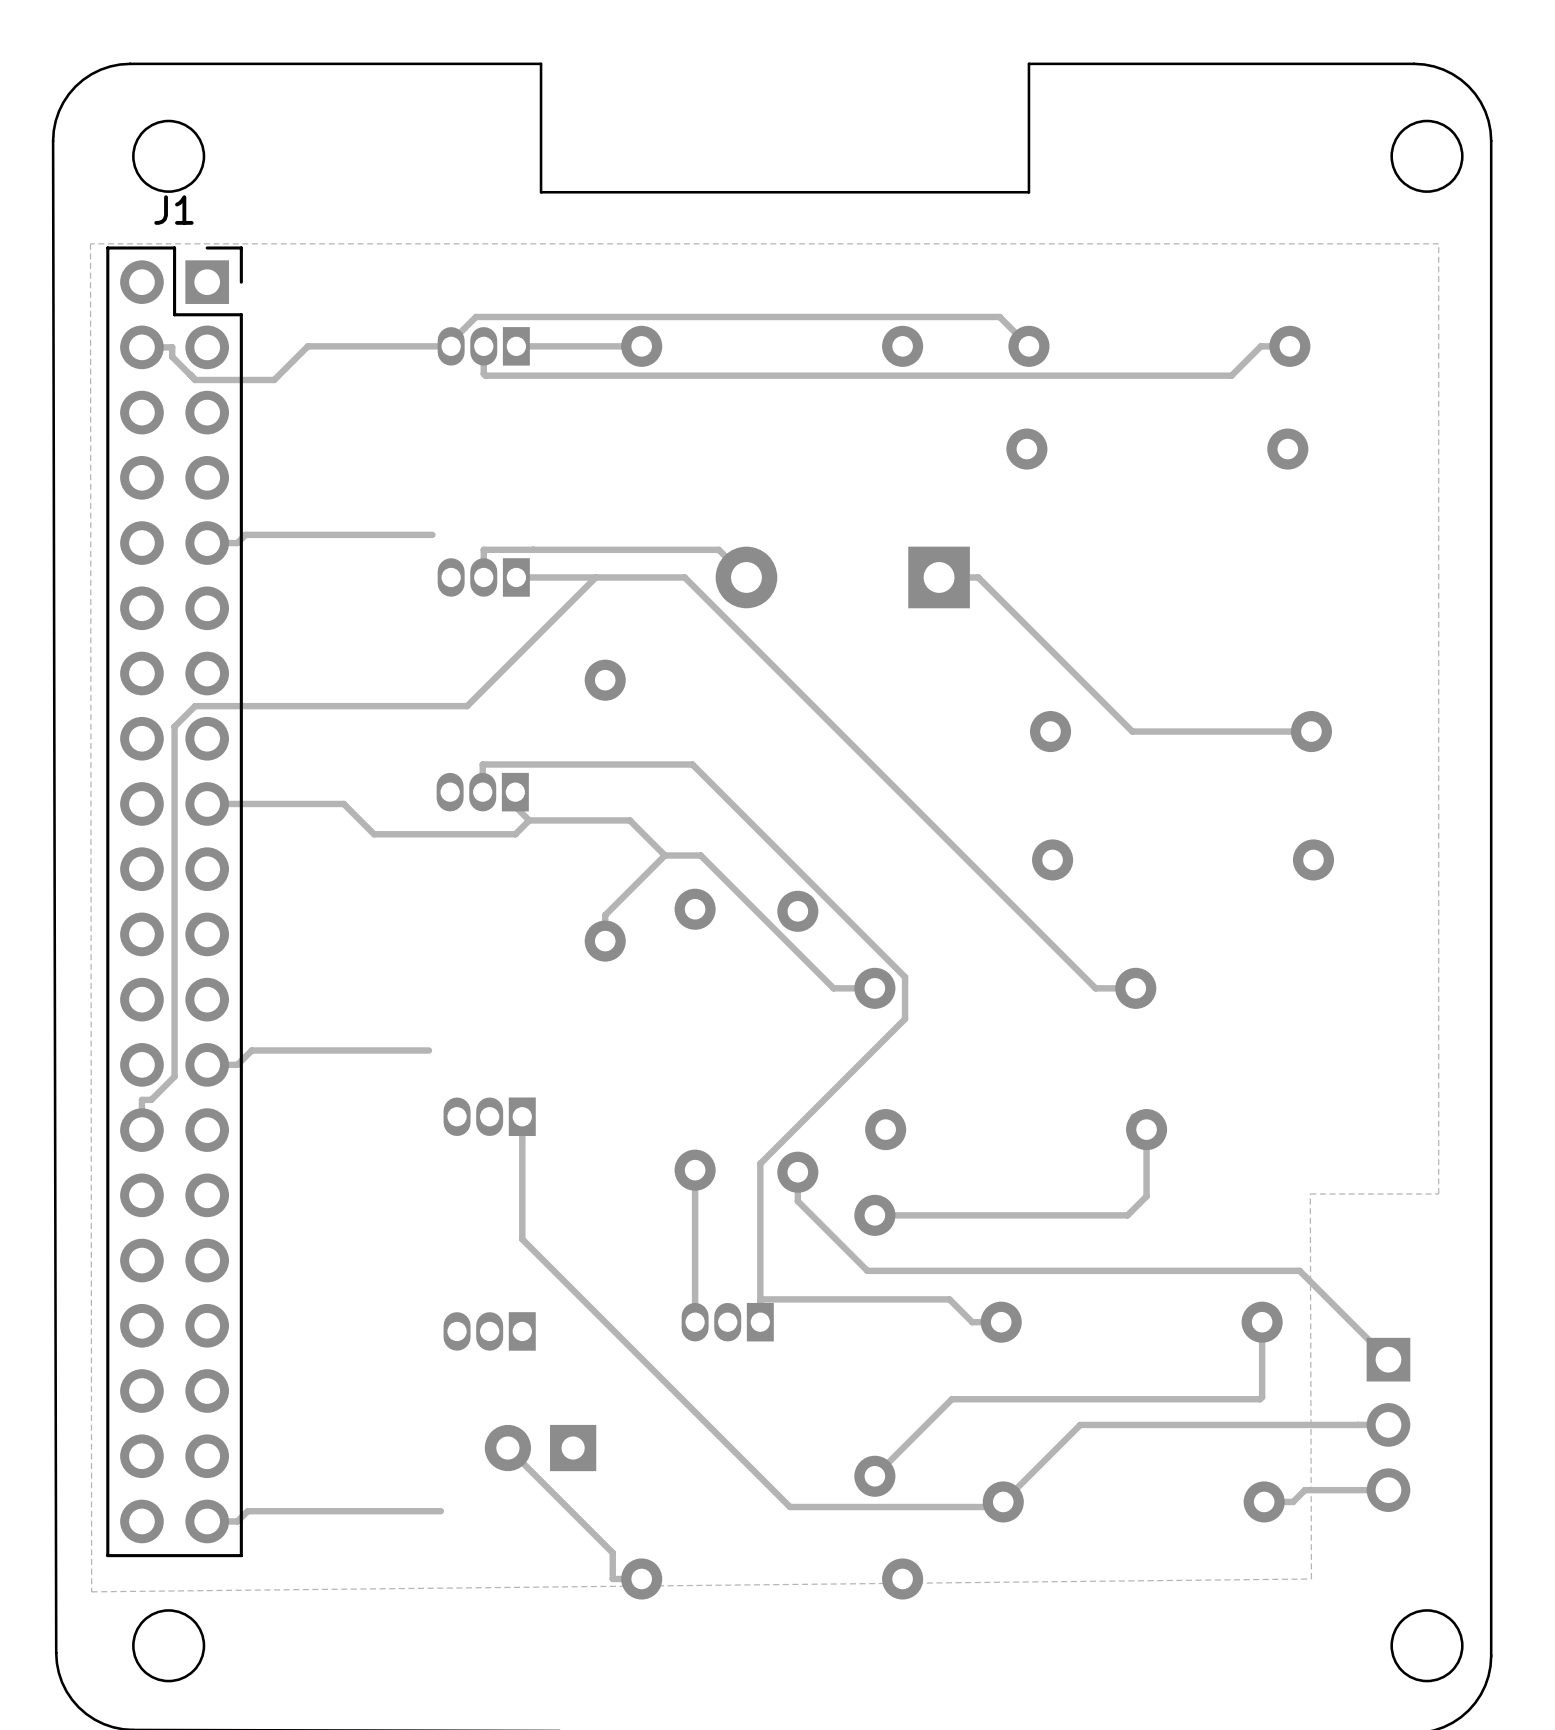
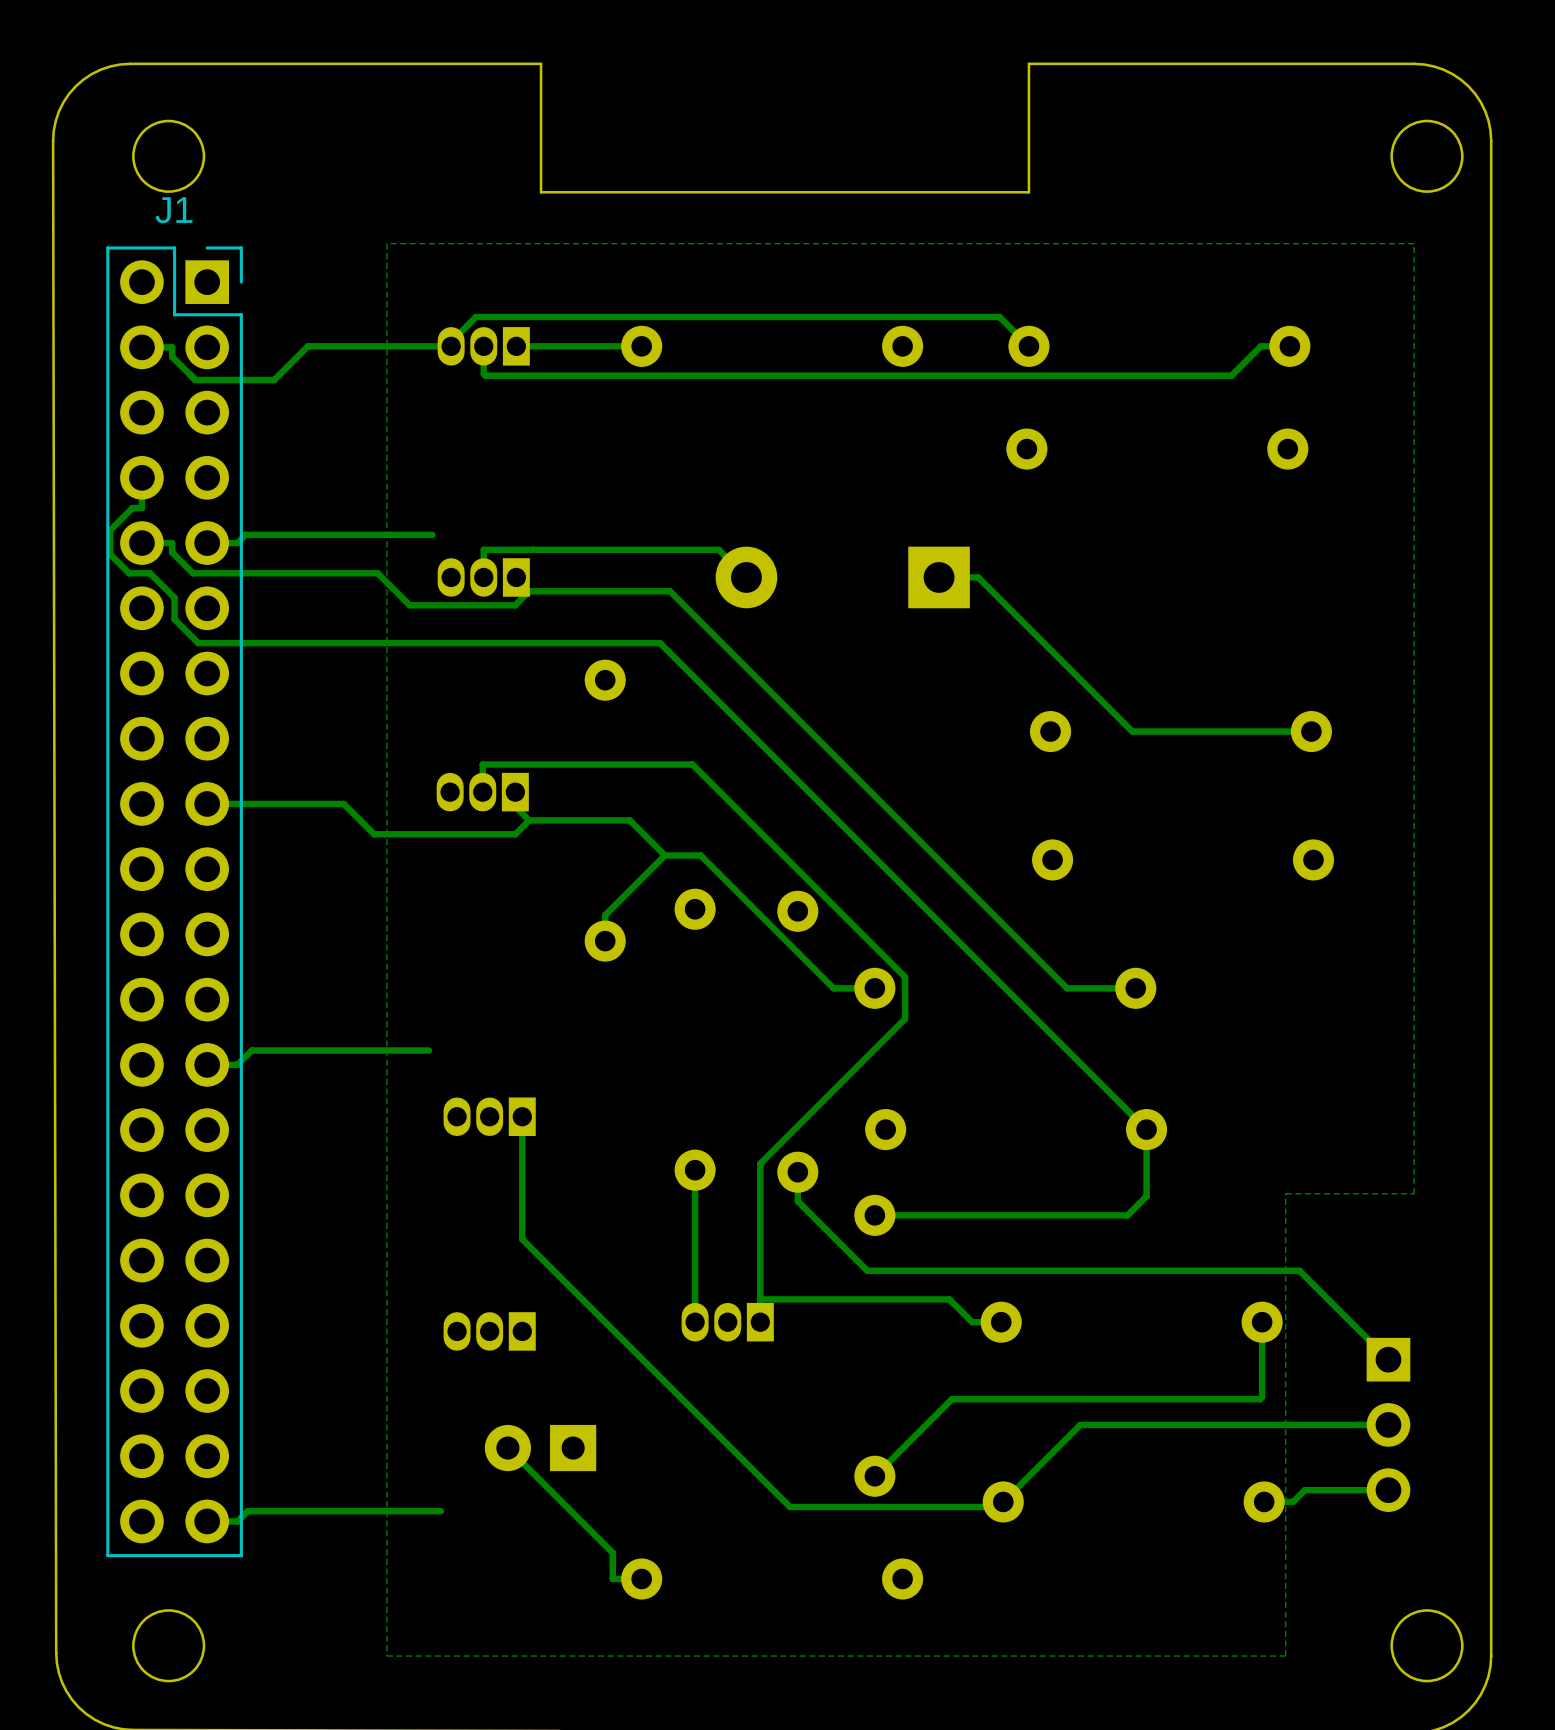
zone outline: (1438, 243) (90, 243) (91, 1591) (1311, 1578) (1310, 1193) (1438, 1193) (1438, 243) -> (1414, 243) (1414, 1193) (1285, 1193) (1285, 1656) (386, 1656) (386, 243) (1414, 243)
track: none -> (141, 477) (141, 508) (132, 508) (110, 530) (110, 554) (129, 573) (150, 573) (174, 597) (174, 619) (198, 643) (660, 643) (1133, 1116)
track: (516, 577) (684, 577) (1095, 988) -> (141, 543) (172, 543) (172, 552) (192, 573) (377, 573) (409, 605) (515, 605) (529, 591) (670, 591) (1067, 988) (1095, 988)
track: (595, 577) (467, 706) (195, 706) (174, 726) (174, 1076) (151, 1099) (141, 1099) (141, 1130) -> none

